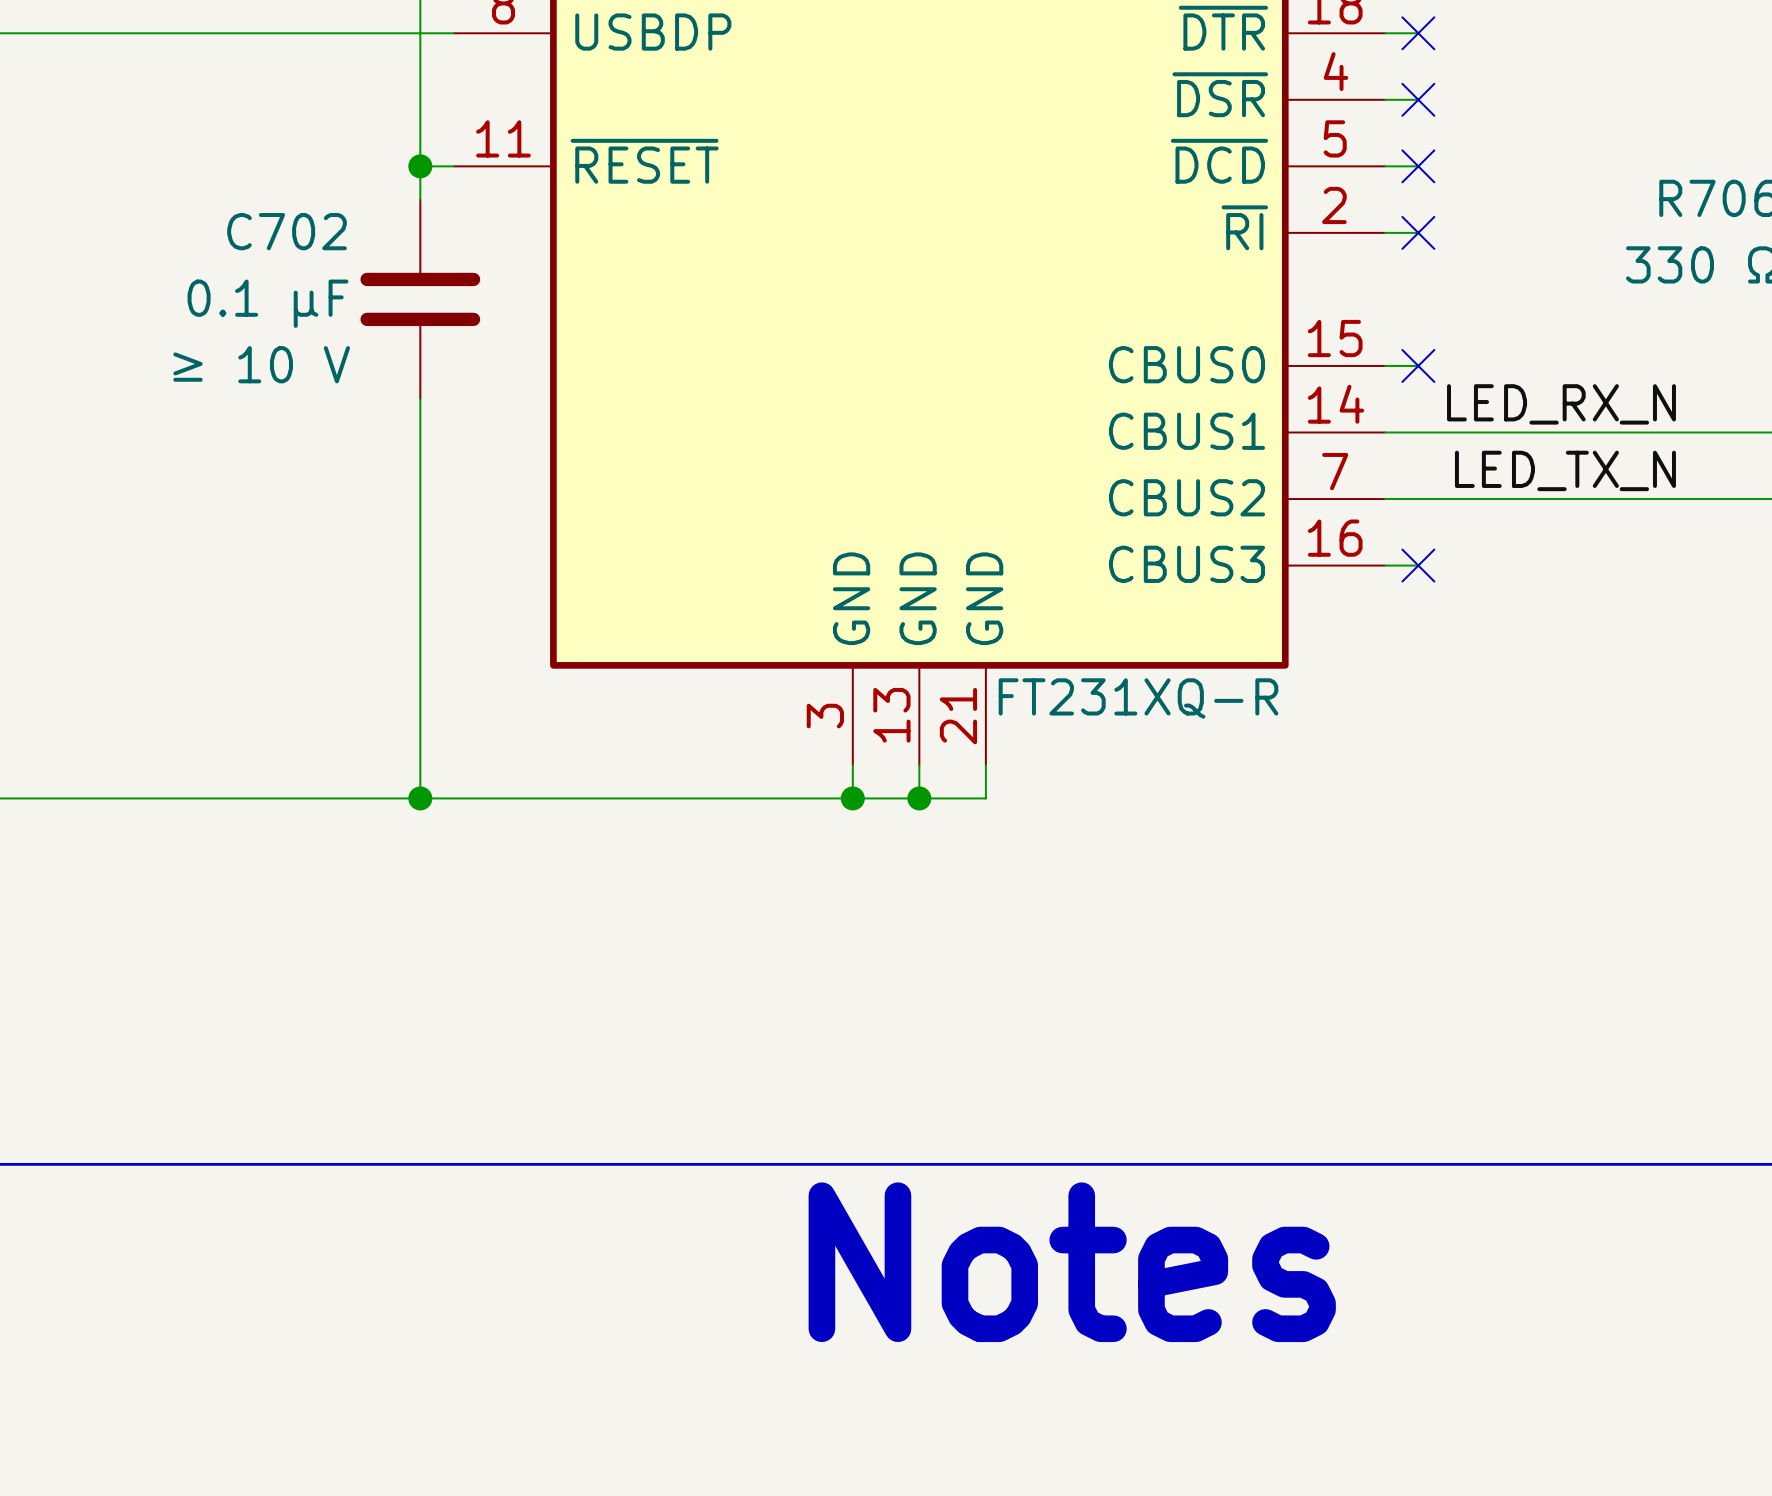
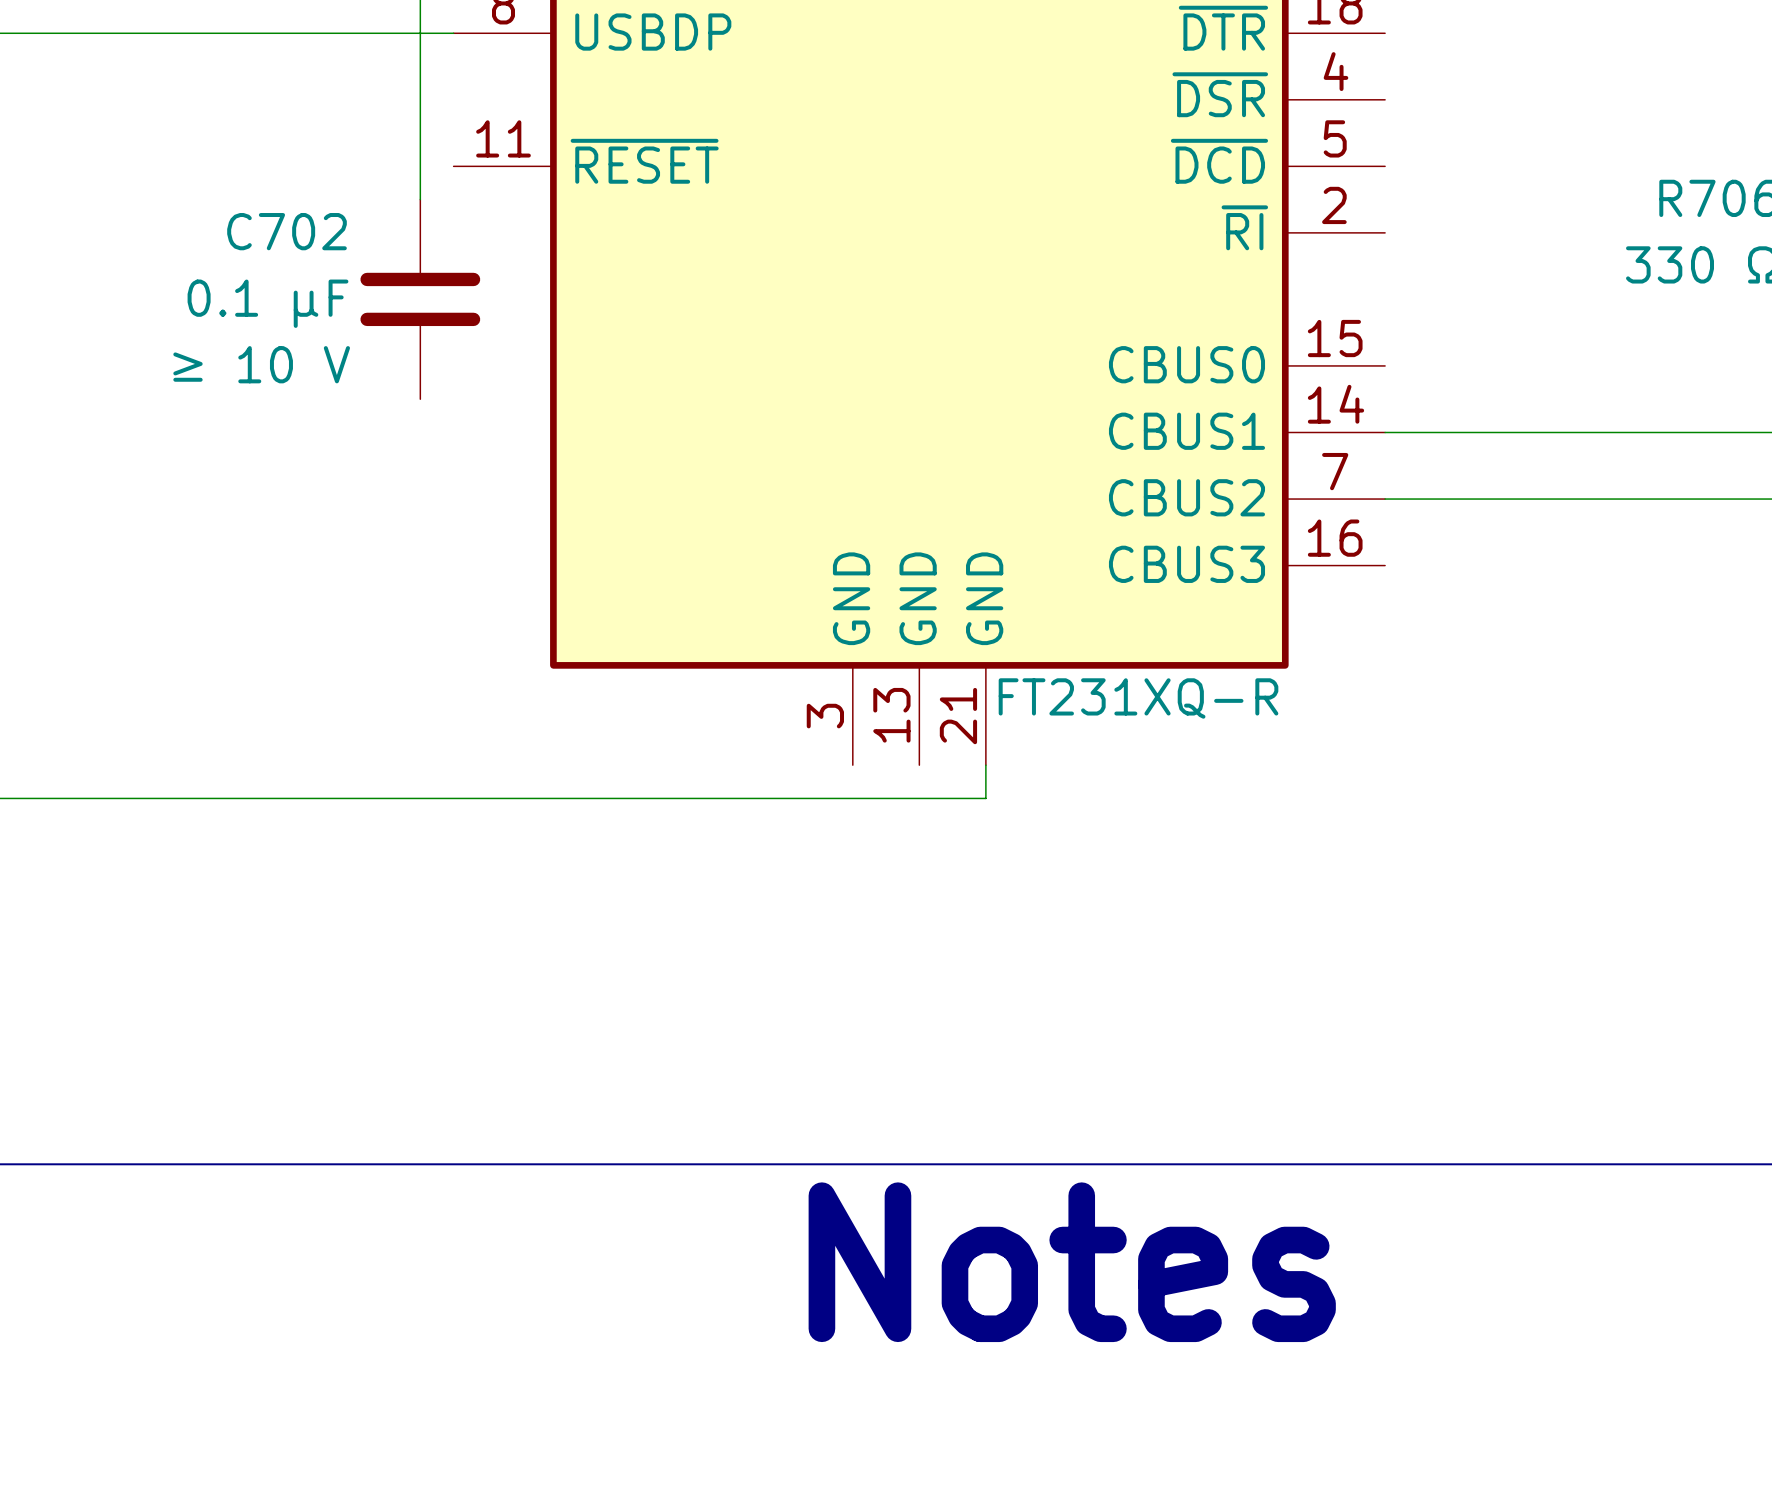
wire: (1385, 33) (1418, 33) -> none
no-connect mark: (1418, 33) -> none
wire: (1385, 99) (1418, 99) -> none
no-connect mark: (1418, 99) -> none
wire: (420, 166) (453, 166) -> none
junction: (420, 166) -> none
wire: (1385, 166) (1418, 166) -> none
no-connect mark: (1418, 166) -> none
wire: (1385, 232) (1418, 232) -> none
no-connect mark: (1418, 232) -> none
wire: (1385, 365) (1418, 365) -> none
no-connect mark: (1418, 365) -> none
wire: (420, 399) (420, 798) -> none
label: LED_RX_N (1561, 404) -> none
label: LED_TX_N (1565, 470) -> none
wire: (1385, 565) (1418, 565) -> none
no-connect mark: (1418, 565) -> none
wire: (852, 765) (852, 798) -> none
wire: (919, 765) (919, 798) -> none
junction: (420, 798) -> none
junction: (852, 798) -> none
junction: (919, 798) -> none

